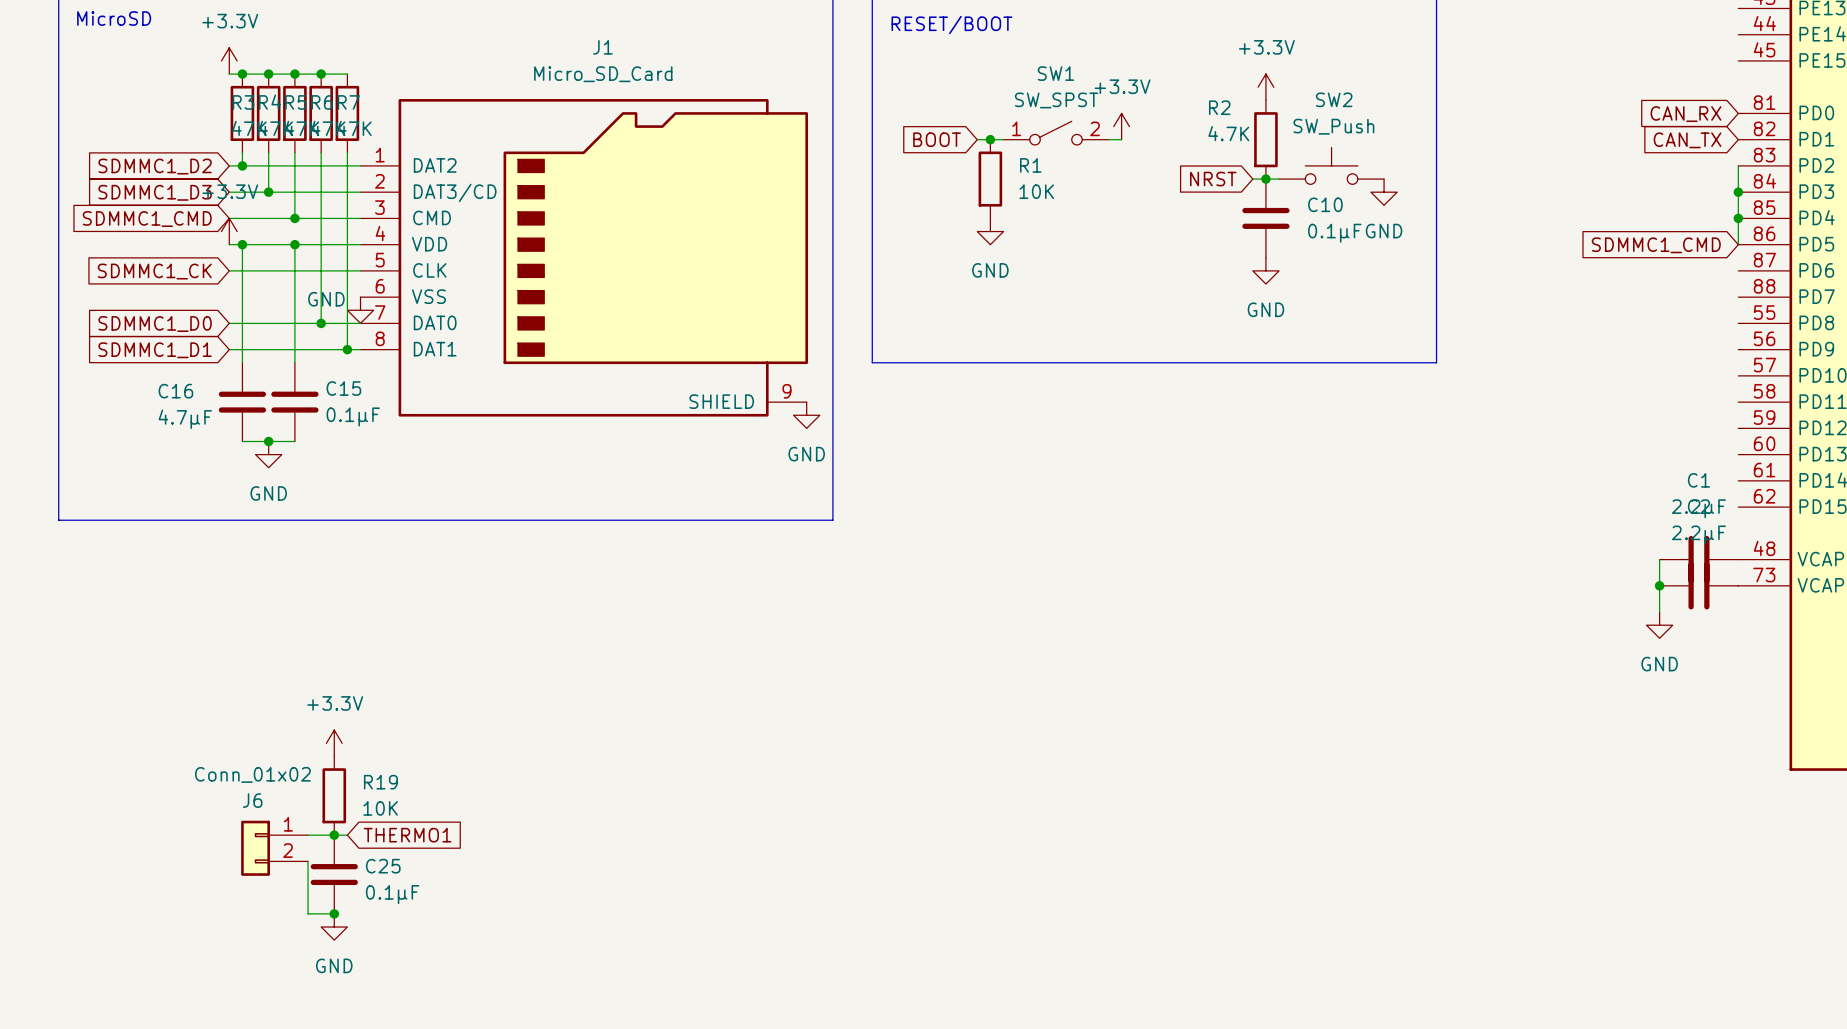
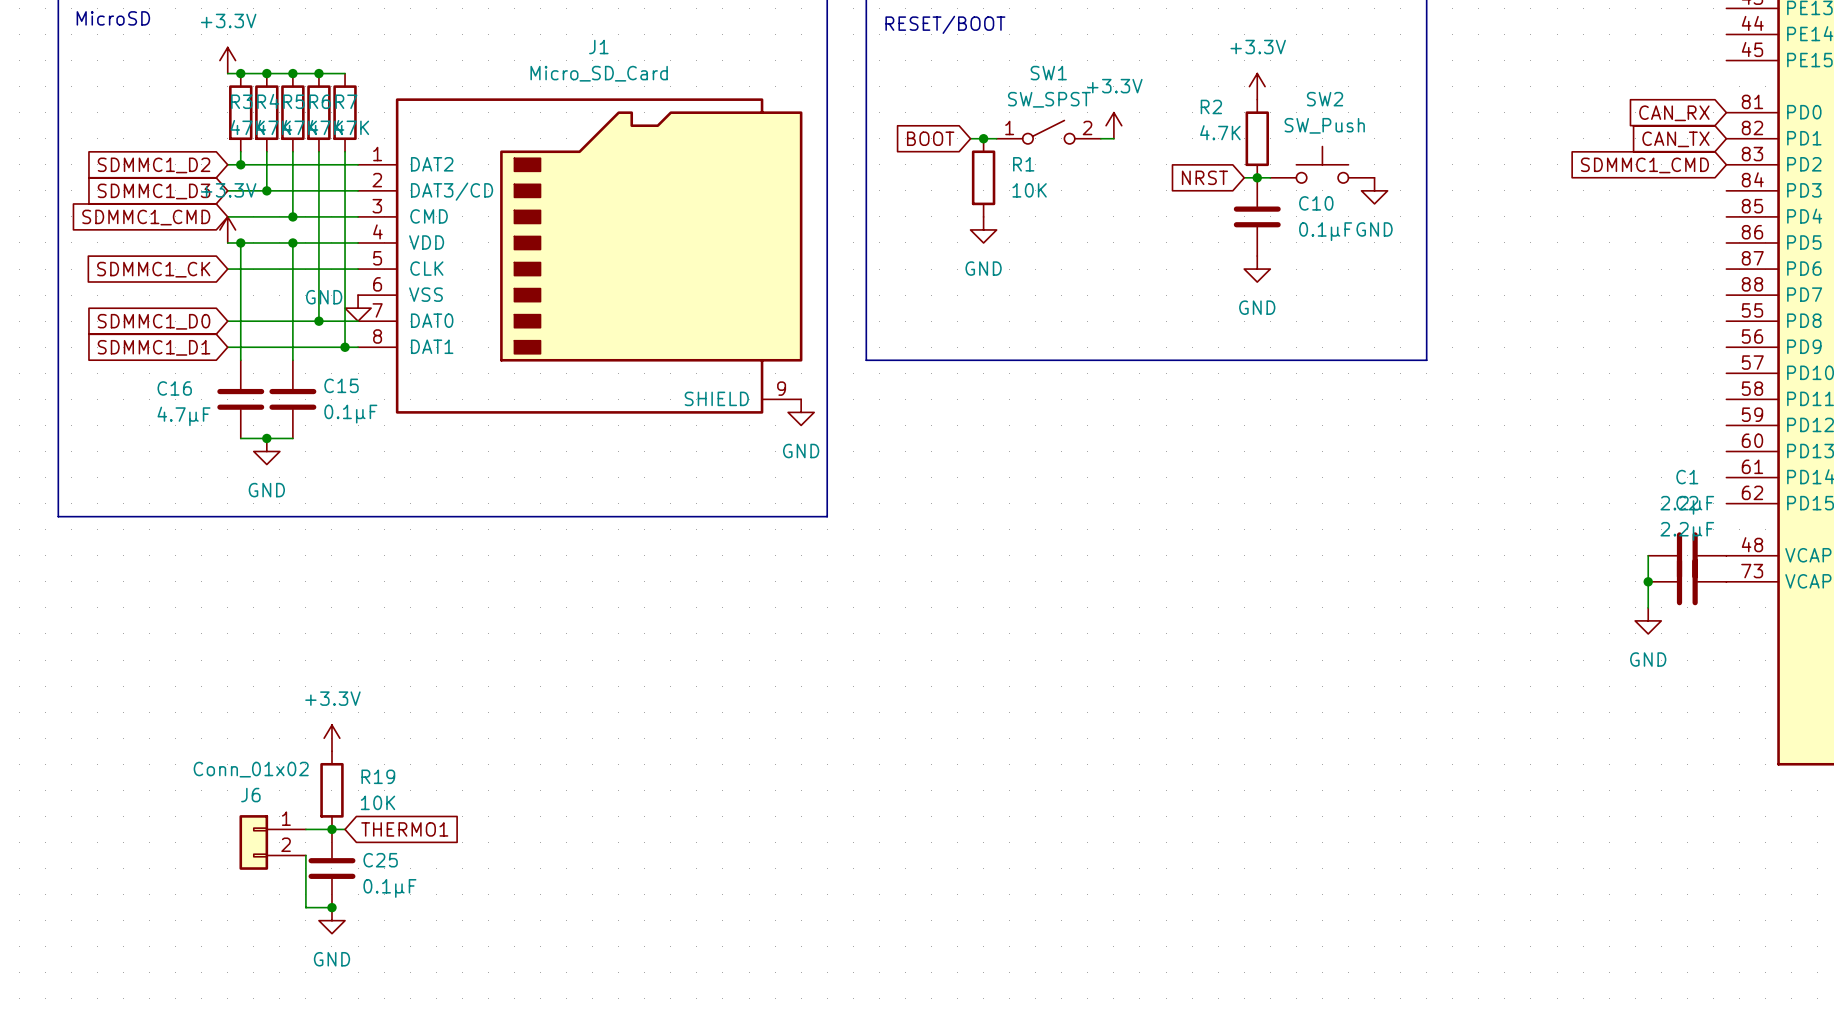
wire: (1738, 165) (1738, 244) -> none
junction: (1738, 192) -> none
junction: (1738, 218) -> none
global label position: SDMMC1_CMD (1656, 245) -> SDMMC1_CMD (1644, 165)

